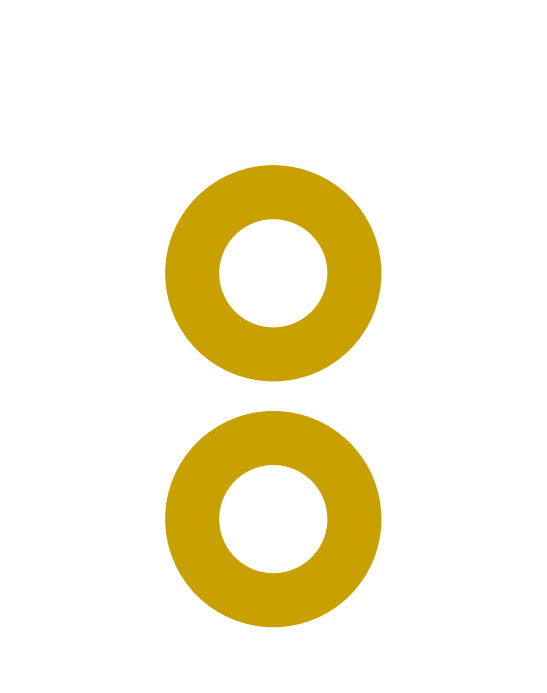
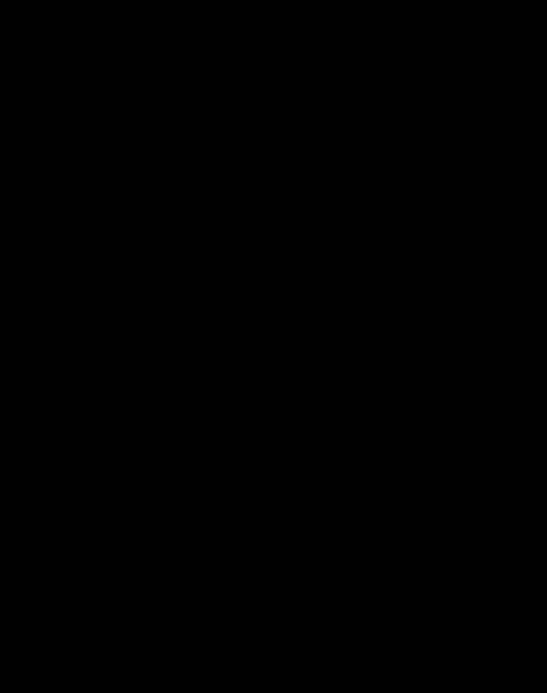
part: (273, 273) -> none
part: (273, 519) -> none

